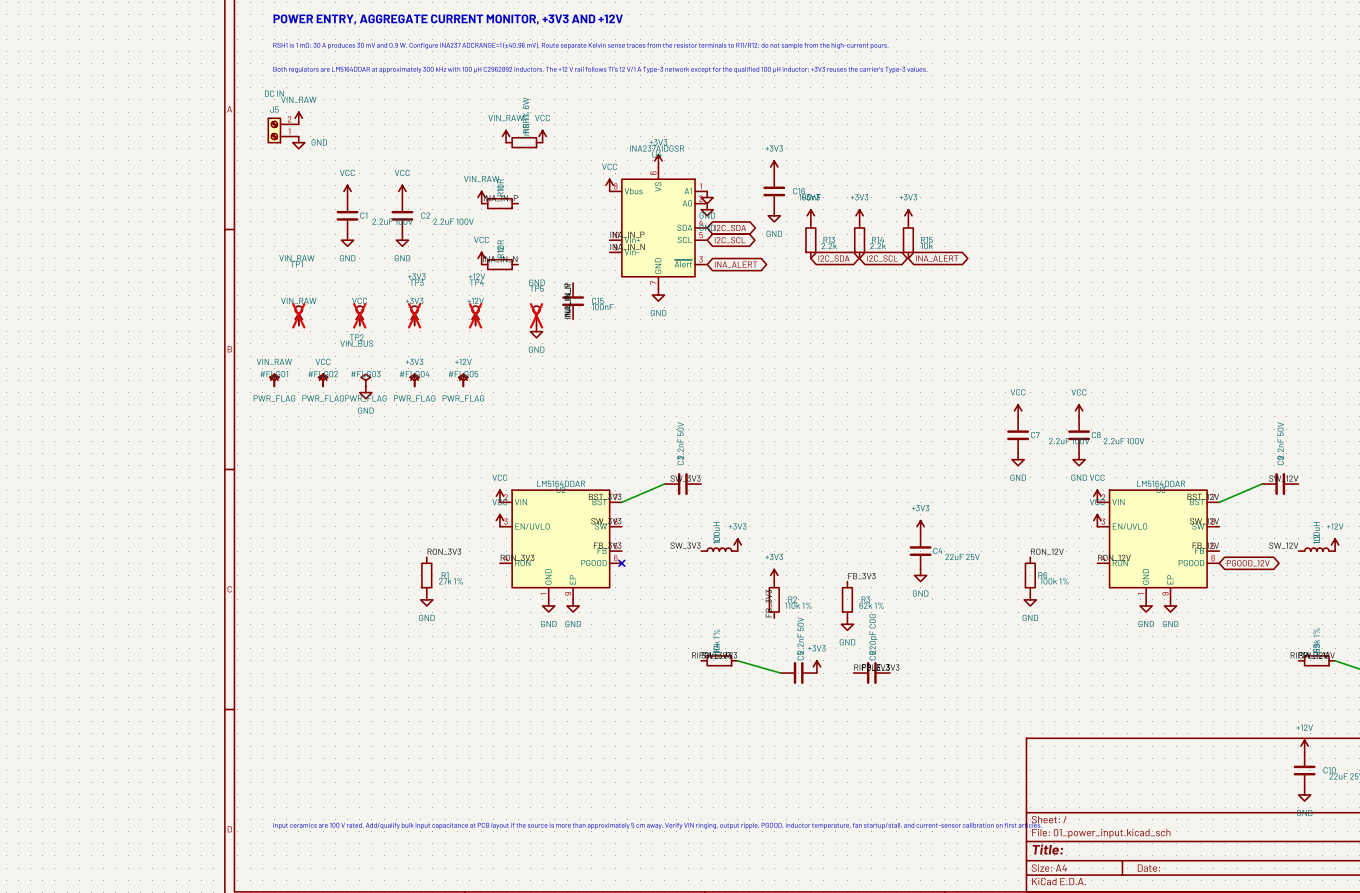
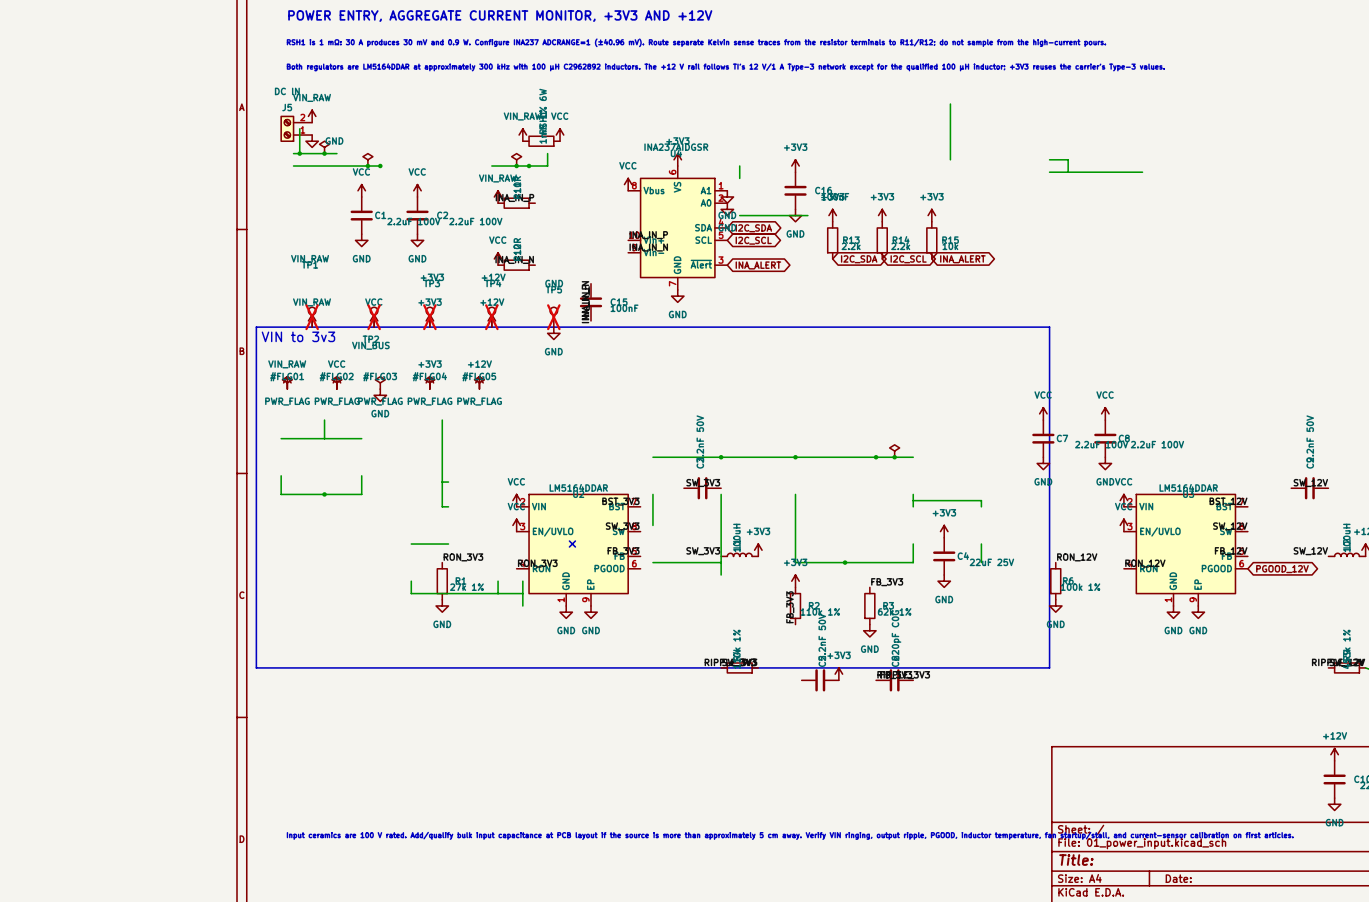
wire: none -> (950, 104) (950, 159)
wire: none -> (299, 128) (299, 153)
power symbol: none -> (324, 147)
wire: none -> (293, 153) (336, 153)
junction: none -> (299, 153)
junction: none -> (324, 153)
wire: none -> (547, 153) (547, 166) (491, 166)
power symbol: none -> (367, 159)
power symbol: none -> (516, 159)
wire: none -> (1049, 159) (1068, 159) (1068, 172)
wire: none -> (293, 166) (380, 166)
junction: none -> (367, 166)
junction: none -> (380, 166)
junction: none -> (516, 166)
junction: none -> (529, 166)
wire: none -> (739, 166) (739, 178)
wire: none -> (1049, 172) (1142, 172)
wire: none -> (739, 215) (807, 215)
line: none -> (256, 327) (1049, 327) (1049, 667) (256, 667) (256, 327)
text: none -> VIN to 3v3 (298, 336)
wire: none -> (324, 420) (324, 438)
wire: none -> (442, 420) (442, 506) (448, 506)
wire: none -> (281, 438) (361, 438)
power symbol: none -> (894, 451)
wire: none -> (652, 457) (913, 457)
junction: none -> (721, 457)
junction: none -> (795, 457)
junction: none -> (876, 457)
junction: none -> (894, 457)
wire: none -> (281, 475) (281, 494) (361, 494) (361, 475)
wire: none -> (442, 482) (448, 482)
wire: (664, 484) (621, 502) -> none
wire: (1261, 484) (1219, 502) -> none
junction: none -> (324, 494)
wire: none -> (652, 494) (652, 525)
wire: none -> (721, 494) (721, 574)
wire: none -> (795, 494) (795, 562) (913, 562) (913, 544)
wire: none -> (913, 494) (913, 506)
wire: none -> (913, 500) (981, 500) (981, 506)
wire: none -> (411, 544) (448, 544)
no-connect mark: none -> (572, 544)
wire: none -> (981, 544) (981, 562)
wire: none -> (652, 562) (721, 562)
junction: none -> (845, 562)
no-connect mark: (621, 563) -> none
wire: none -> (411, 581) (411, 593) (522, 593)
wire: none -> (498, 581) (498, 593)
wire: none -> (522, 581) (522, 605)
wire: (737, 660) (780, 673) -> none

